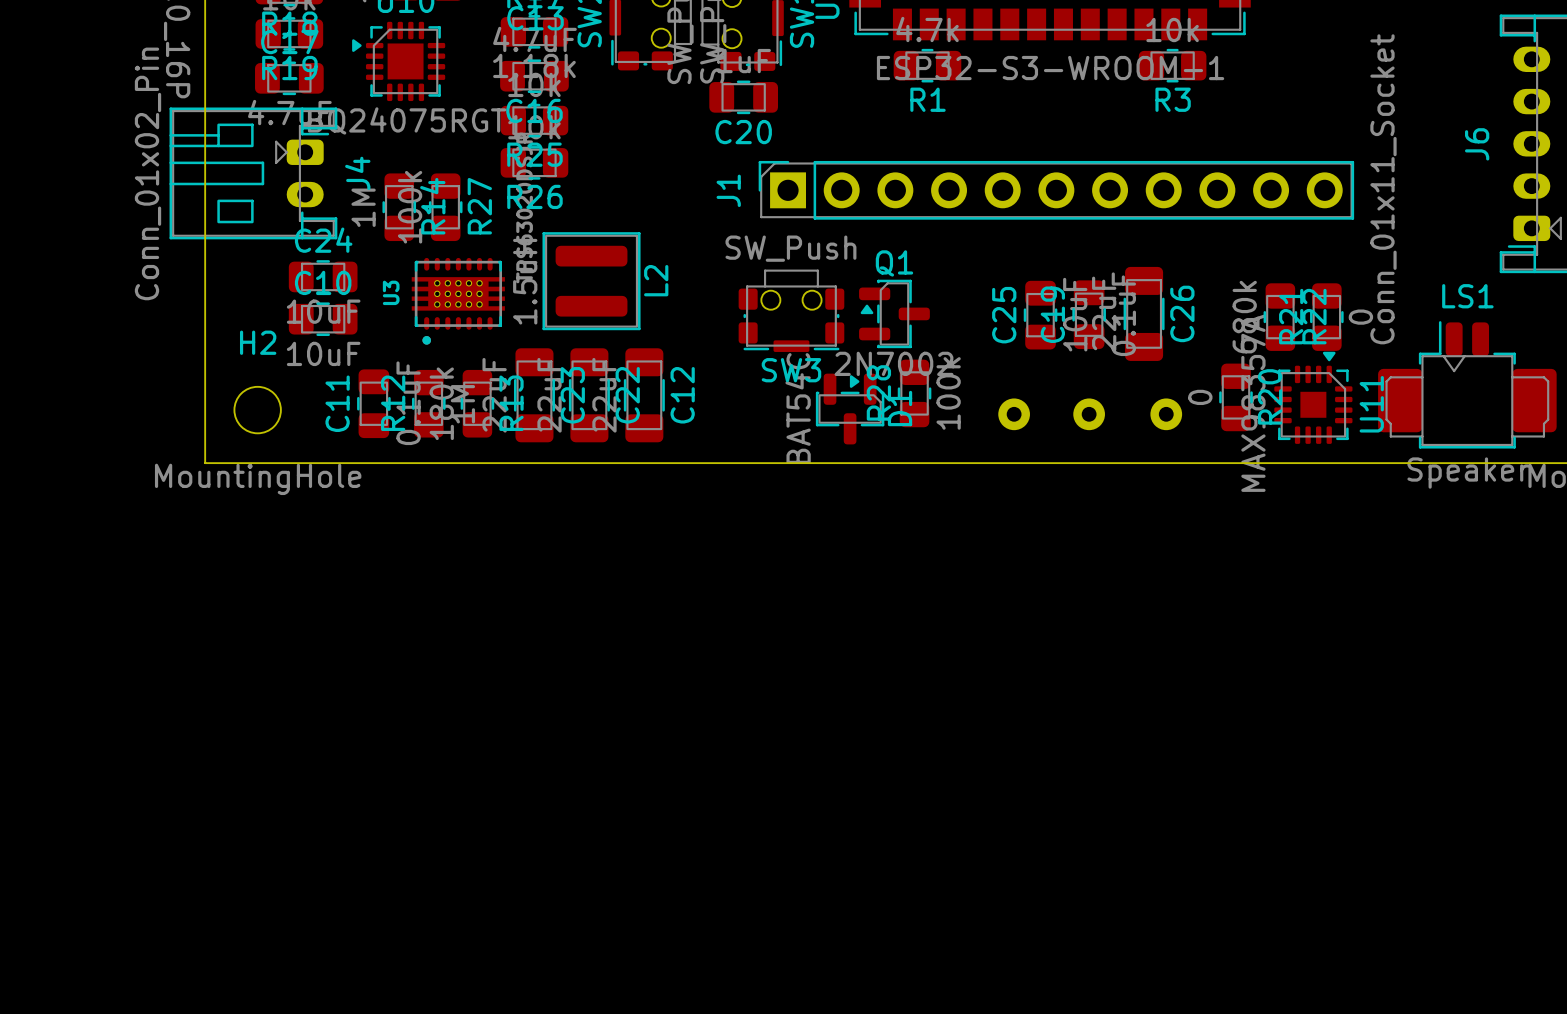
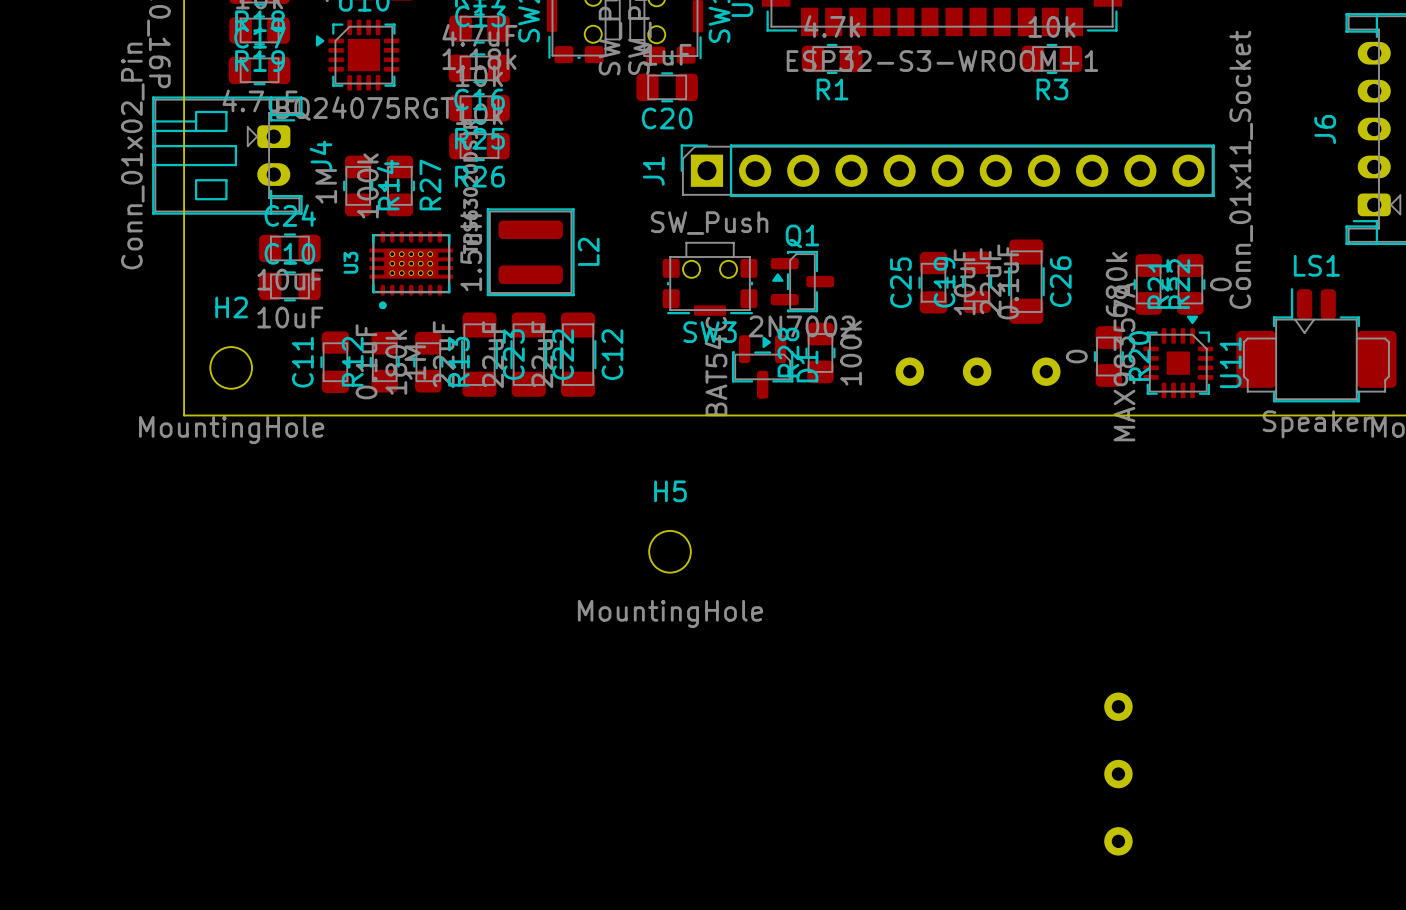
H5: none -> MountingHole (670, 551)
part: none -> (1118, 706)
part: none -> (1118, 774)
part: none -> (1118, 841)

